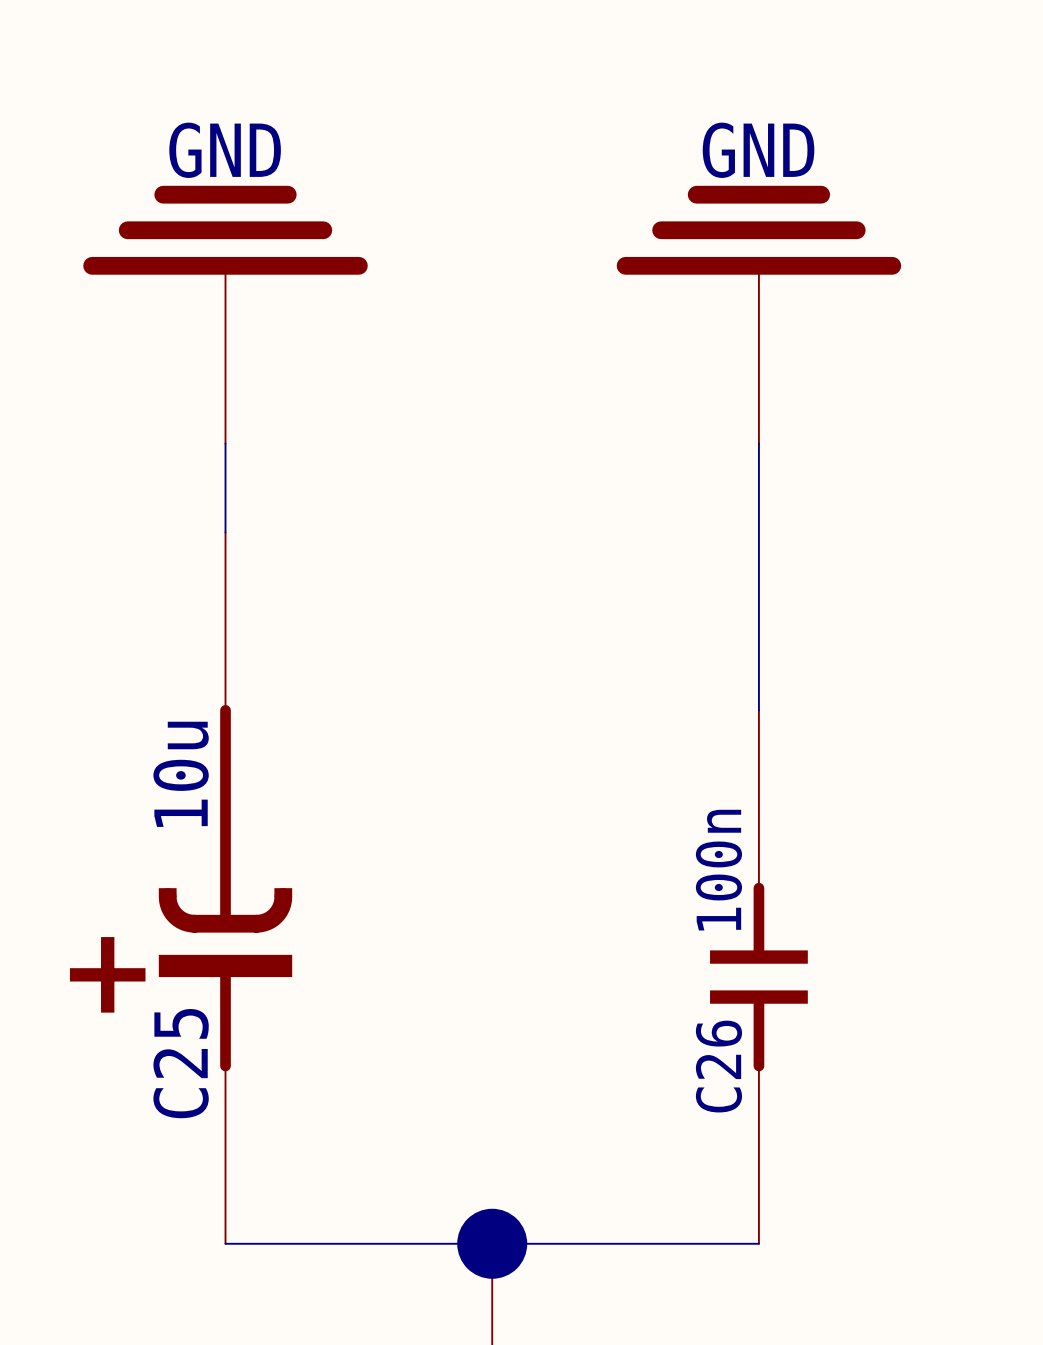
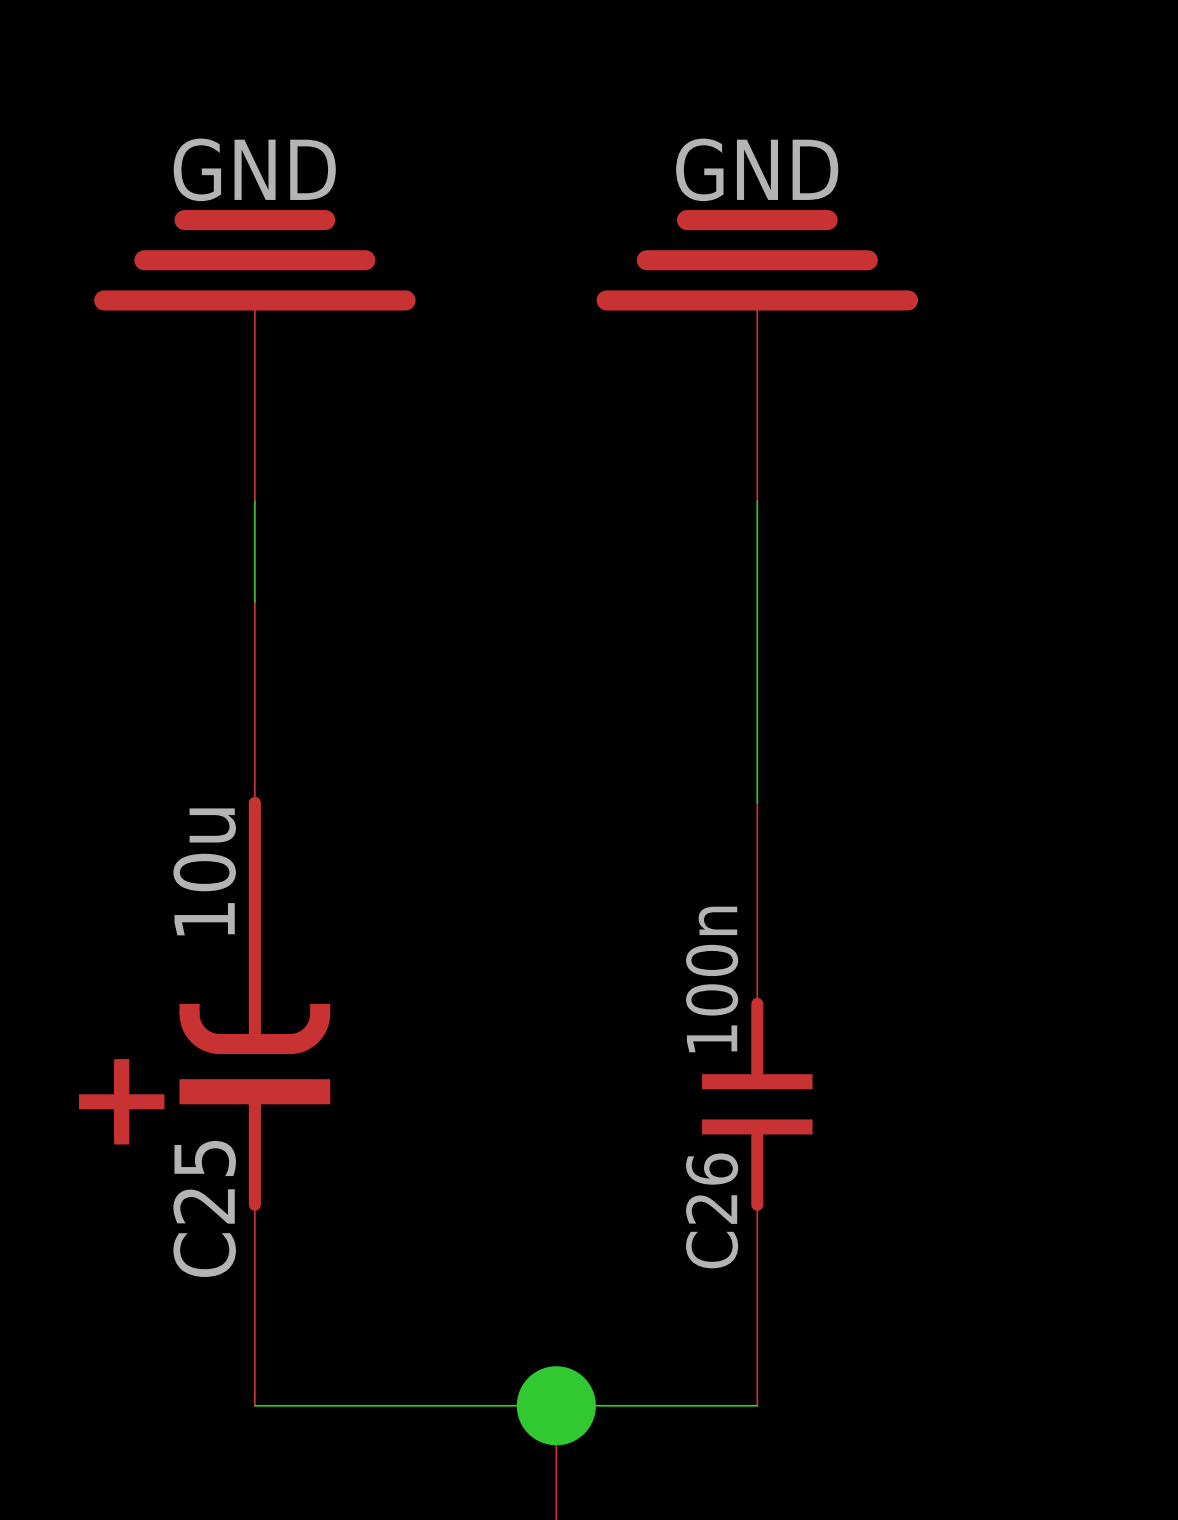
power symbol position: GND (758, 314) -> GND (757, 355)
wire: (758, 443) (758, 710) -> (757, 501) (757, 802)
C26 position: (758, 977) -> (757, 1104)
wire: (670, 1243) (758, 1243) -> none

